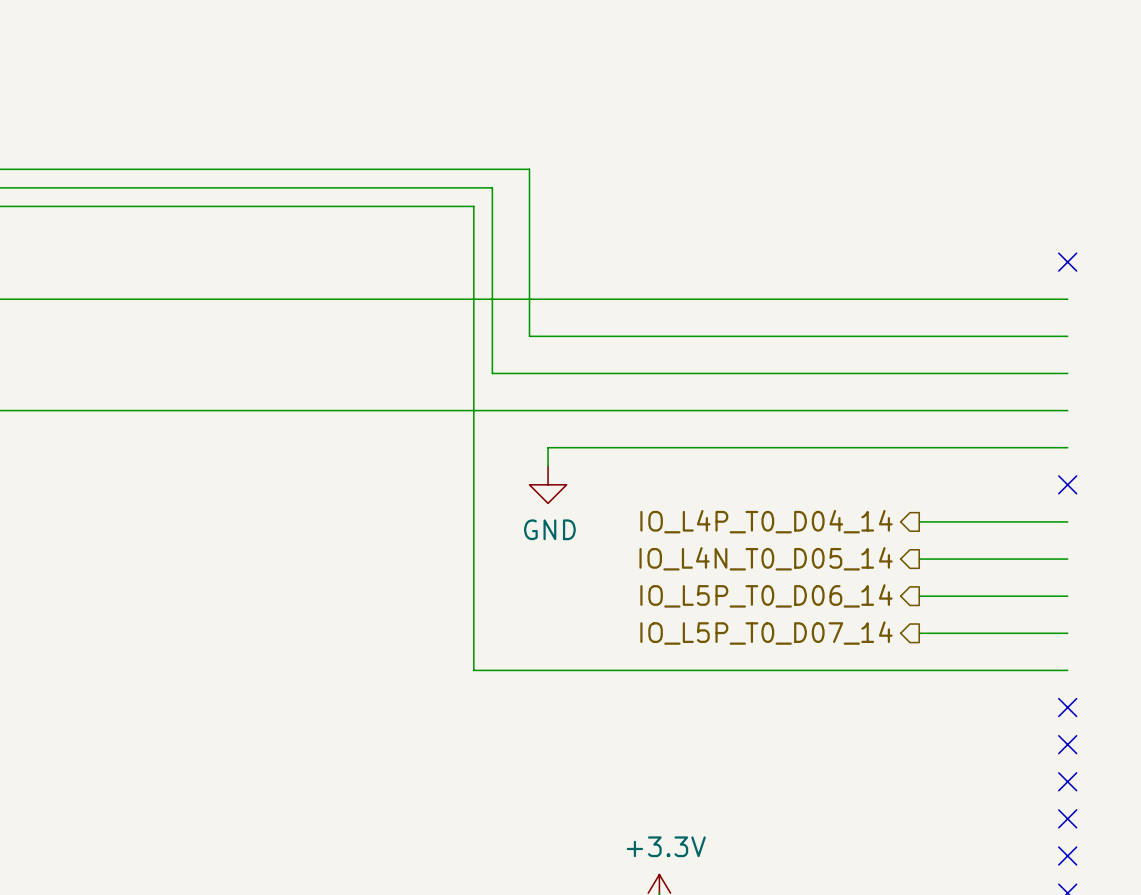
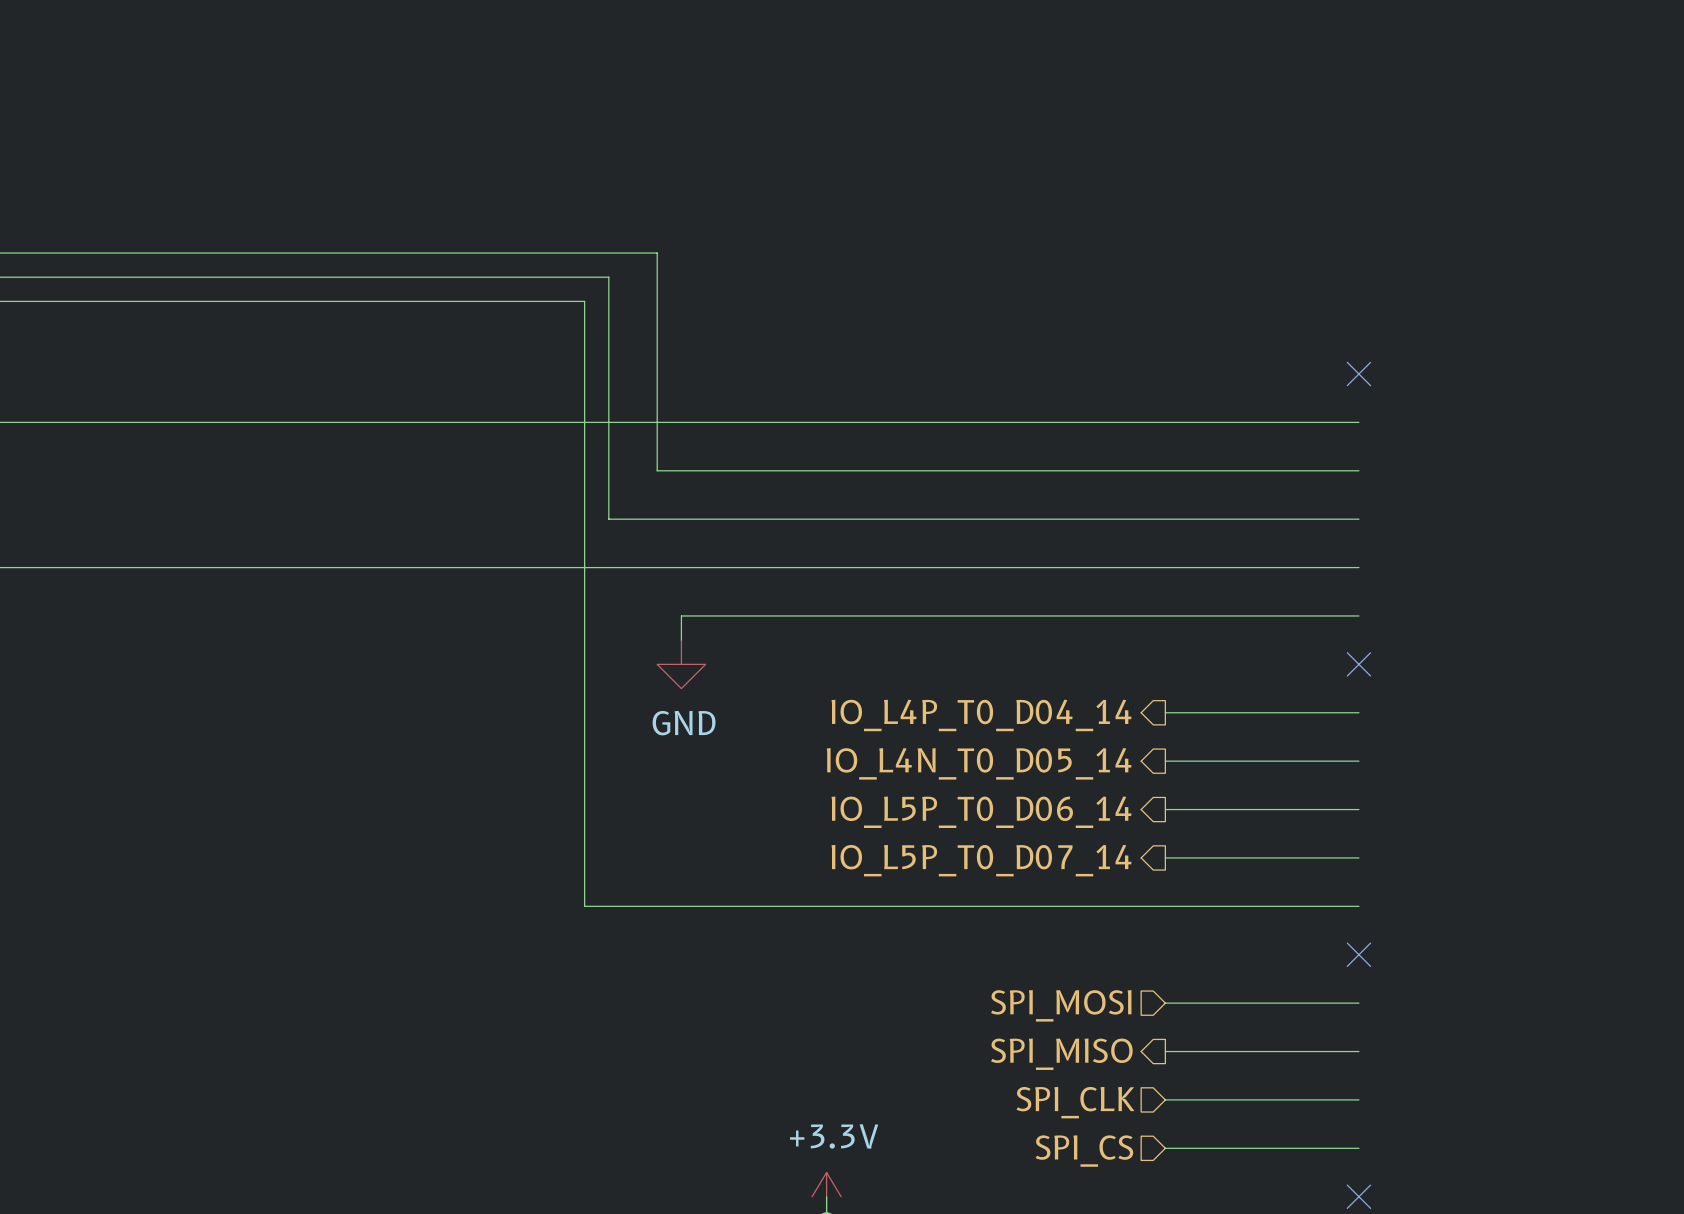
hierarchical label: none -> SPI_MOSI (1061, 1005)
wire: none -> (1165, 1003) (1358, 1003)
no-connect mark: (1067, 744) -> none
hierarchical label: none -> SPI_MISO (1061, 1054)
wire: none -> (1165, 1051) (1358, 1051)
no-connect mark: (1067, 781) -> none
wire: none -> (1165, 1099) (1358, 1099)
no-connect mark: (1067, 818) -> none
hierarchical label: none -> SPI_CLK (1075, 1102)
hierarchical label: none -> SPI_CS (1084, 1151)
wire: none -> (1165, 1148) (1358, 1148)
no-connect mark: (1067, 856) -> none

